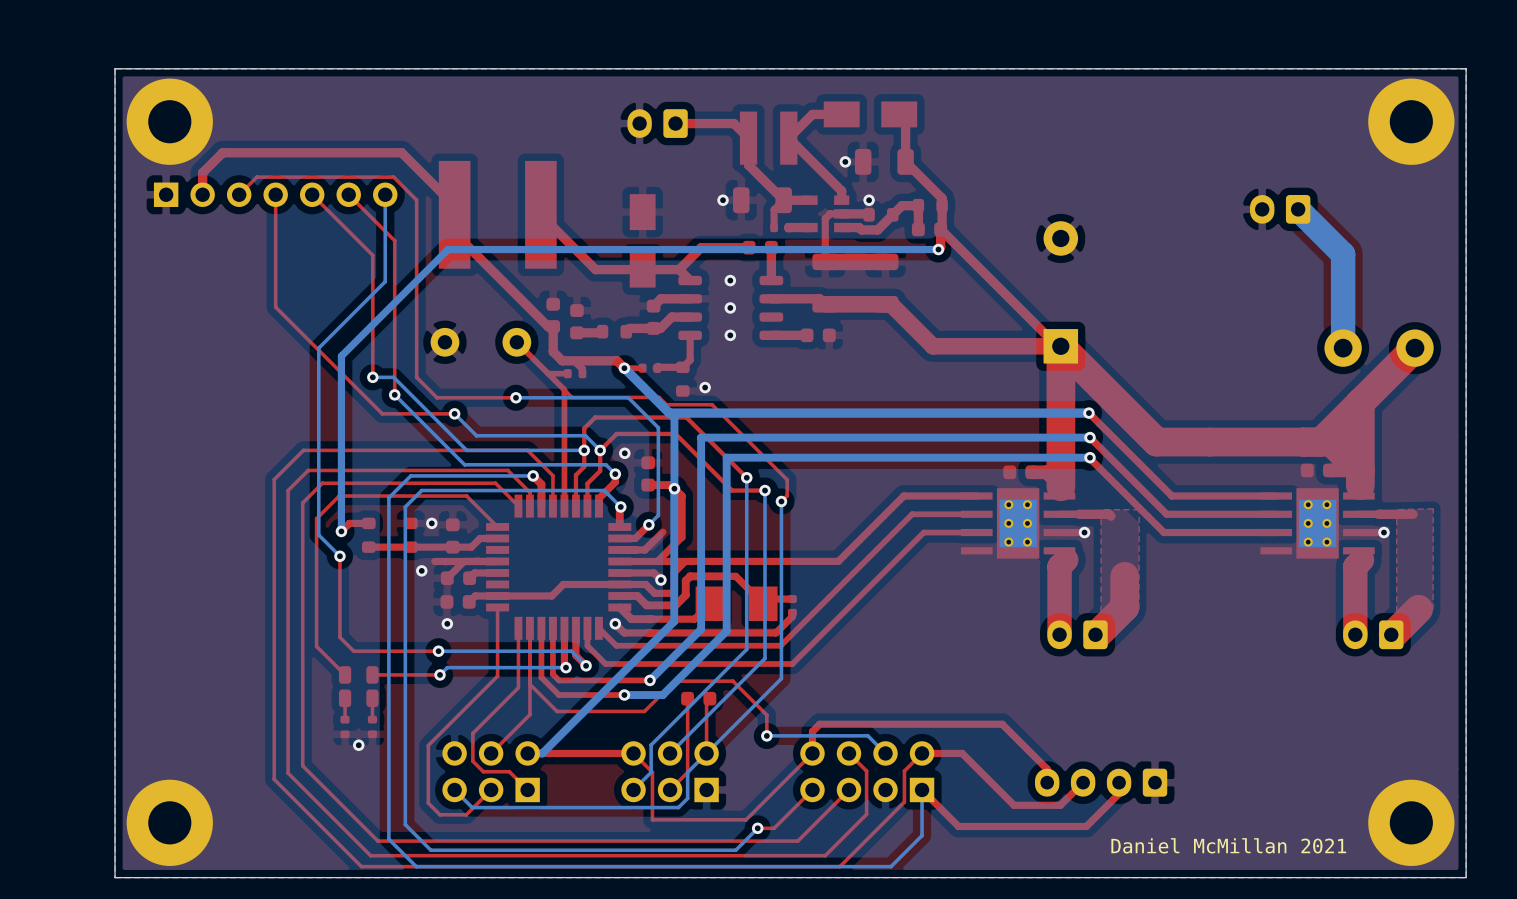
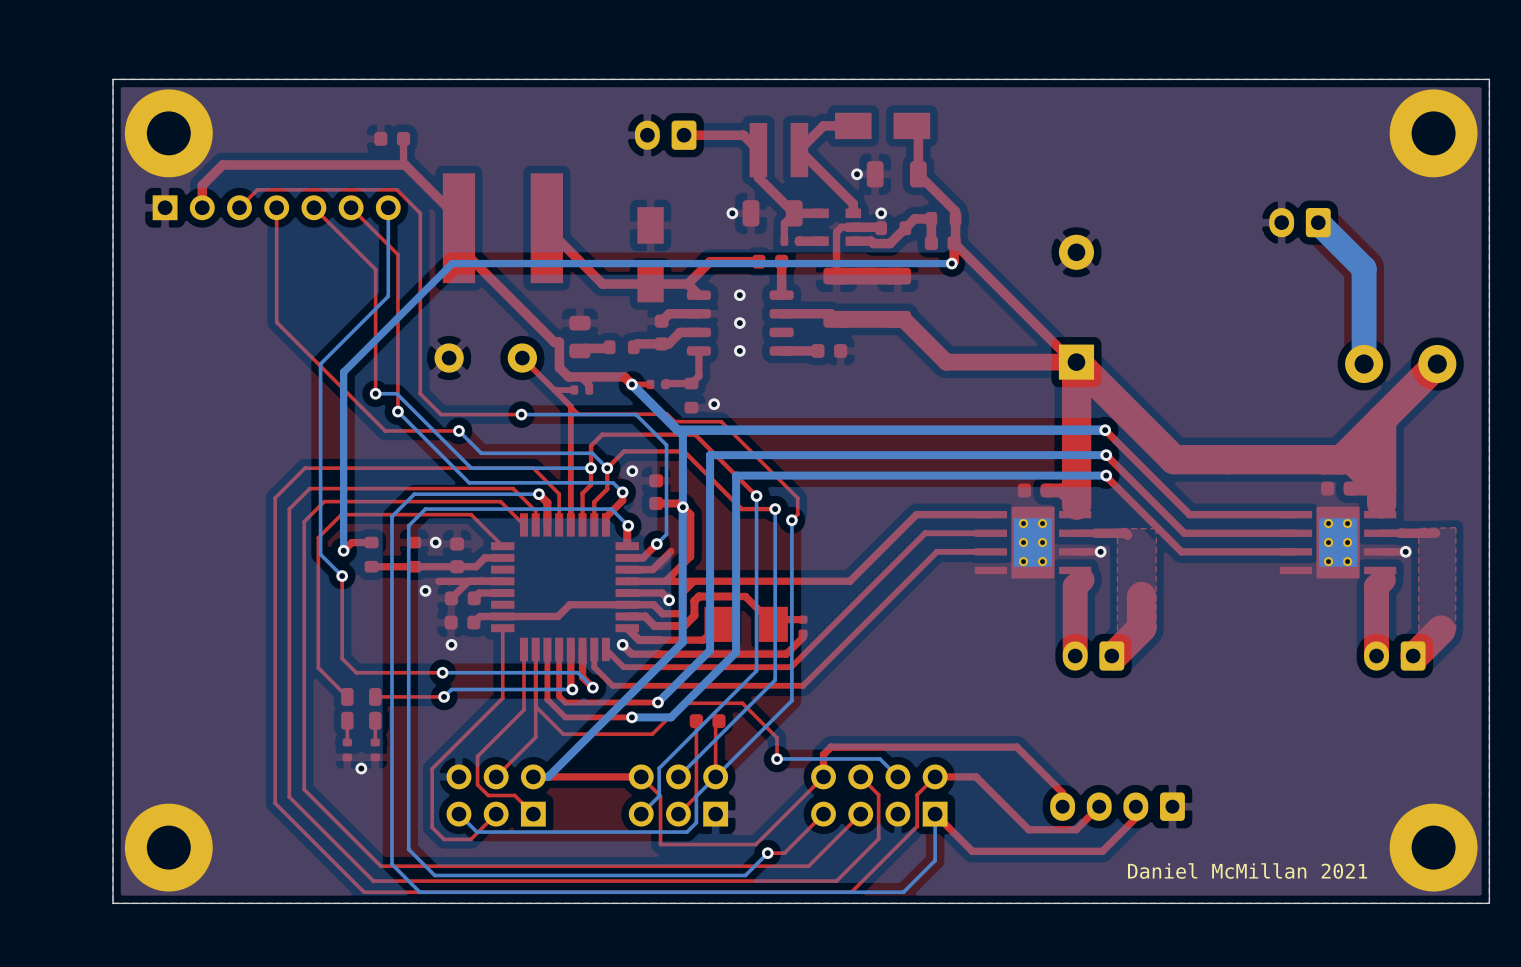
top track: none -> (403, 138) (405, 164)
part footprint: [570, 304, 584, 340] -> [569, 315, 591, 359]
part rotation: 0° (553, 315) -> 90° clockwise (392, 138)
part position: (553, 315) -> (392, 138)

